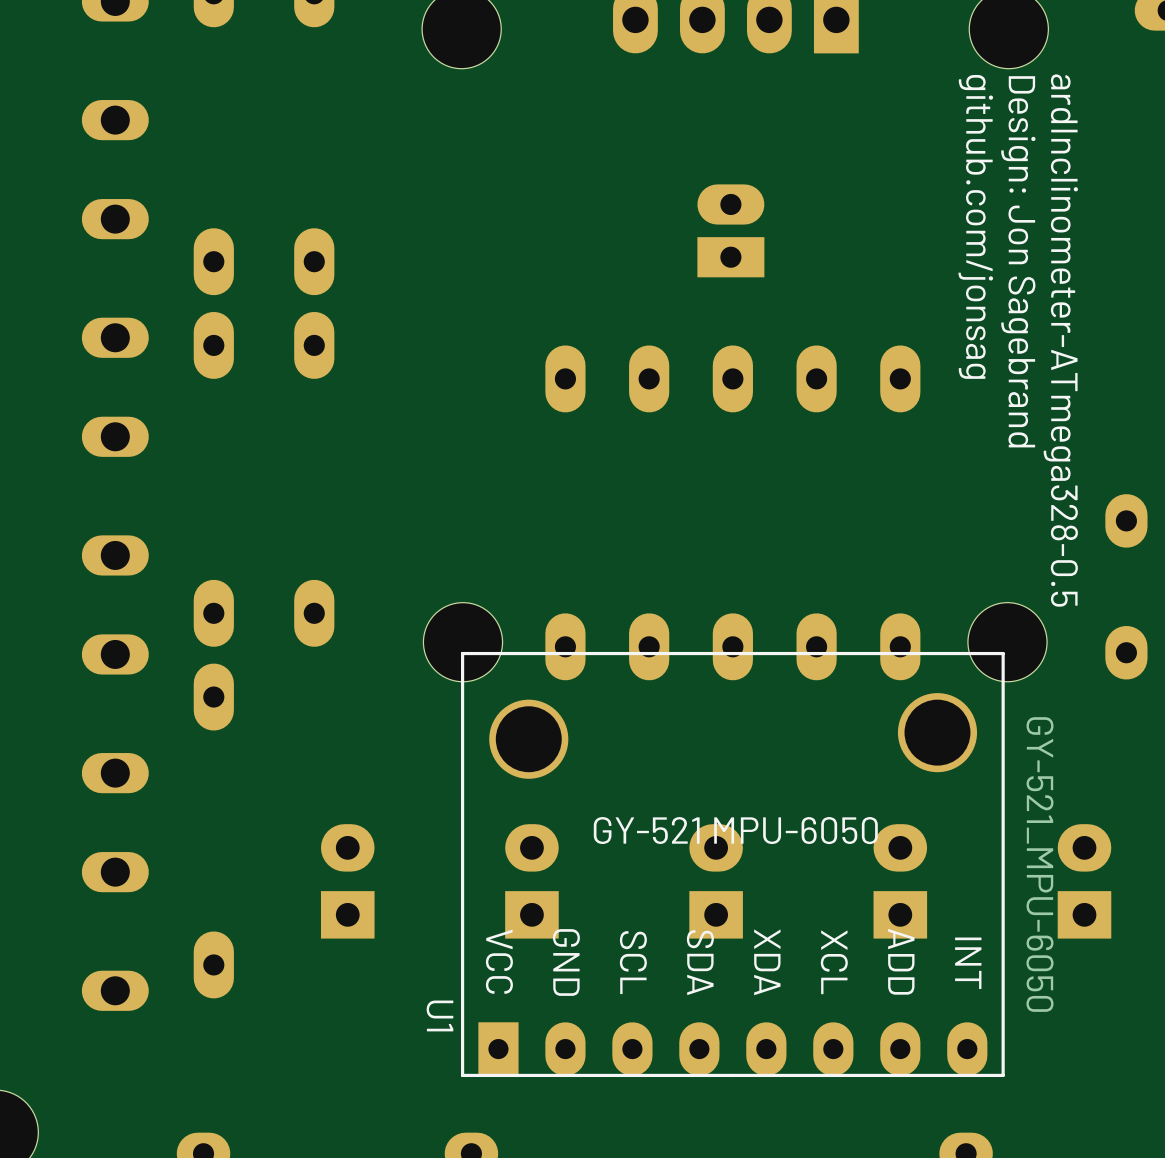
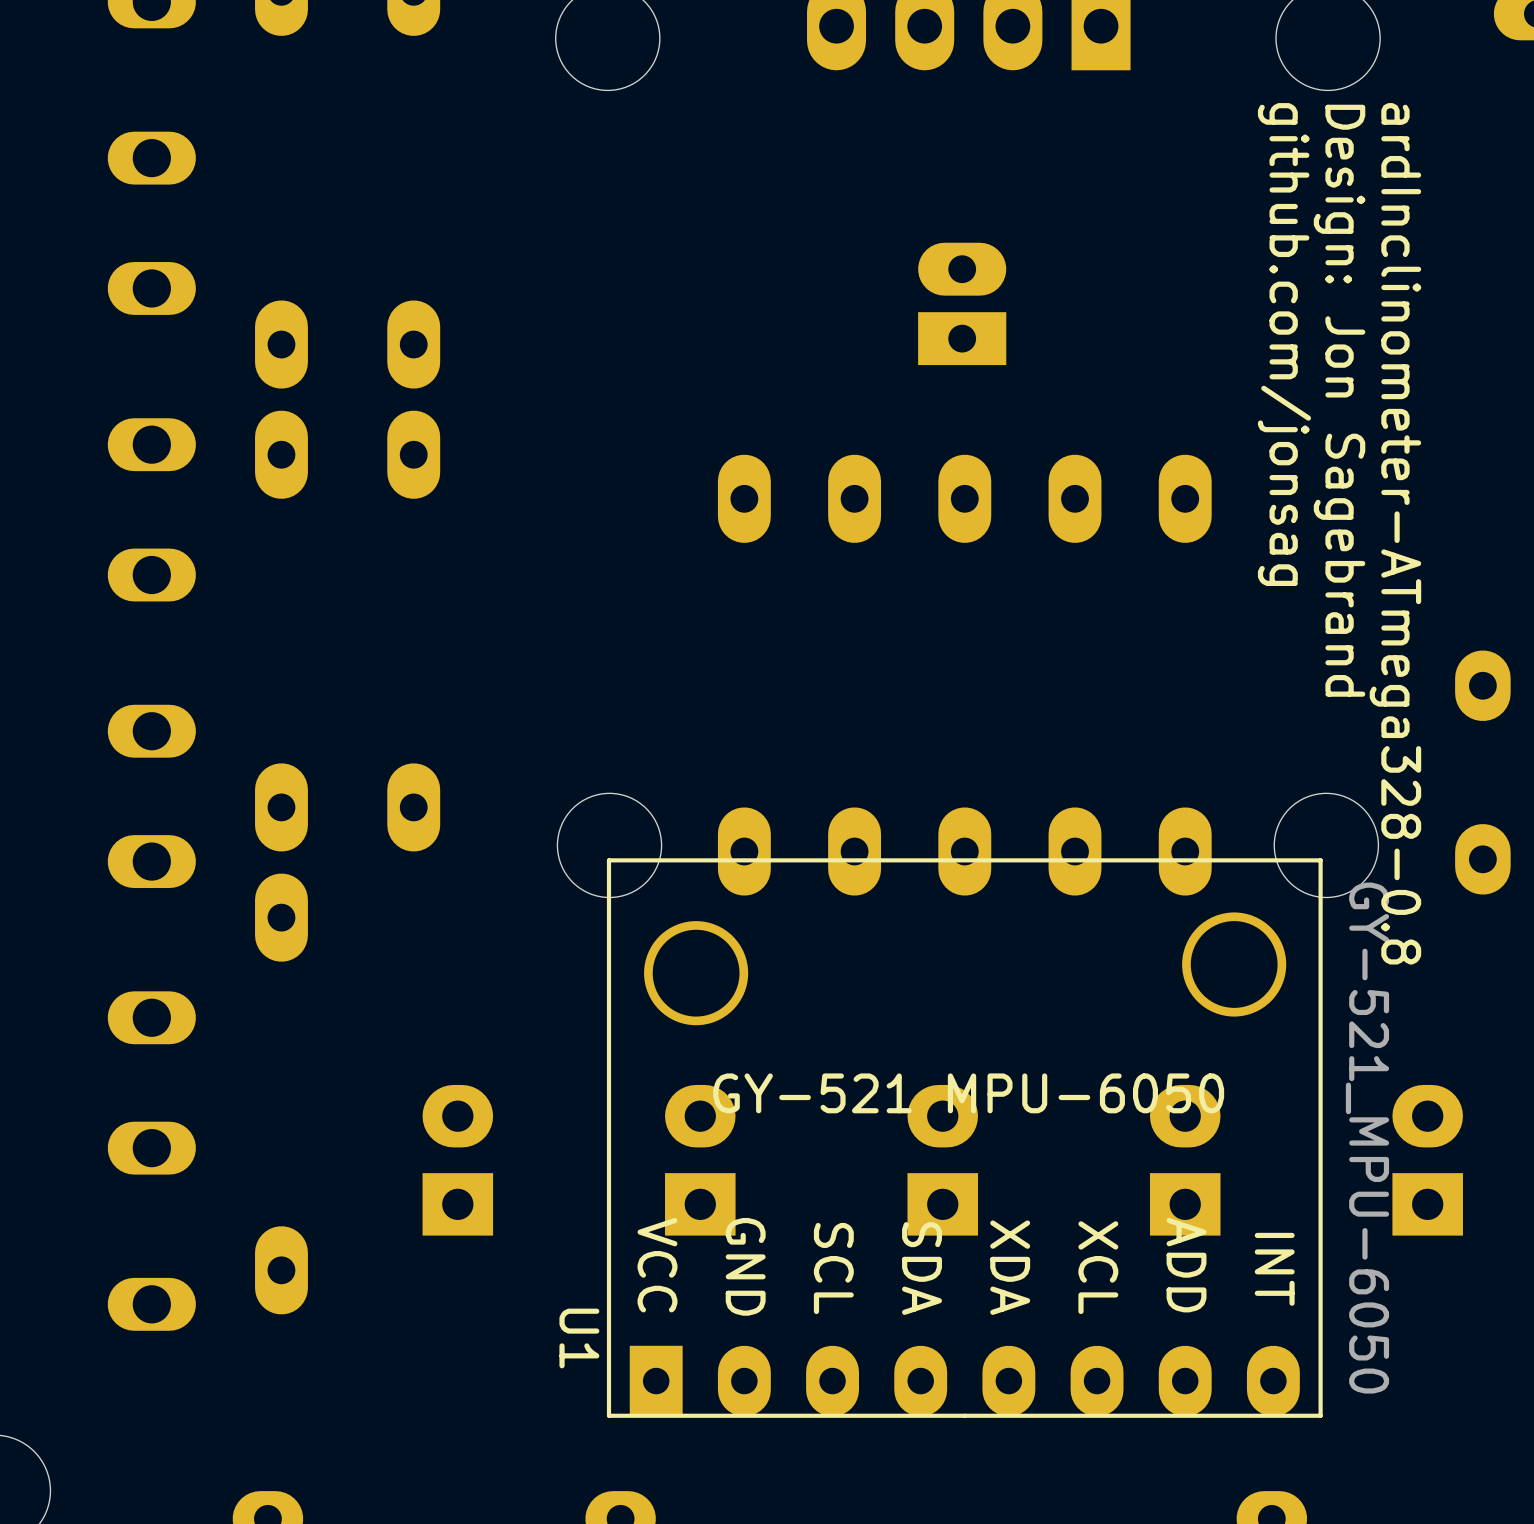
text: ardInclinometer-ATmega328-0.5 (1060, 340) -> ardInclinometer-ATmega328-0.8 (1395, 533)

